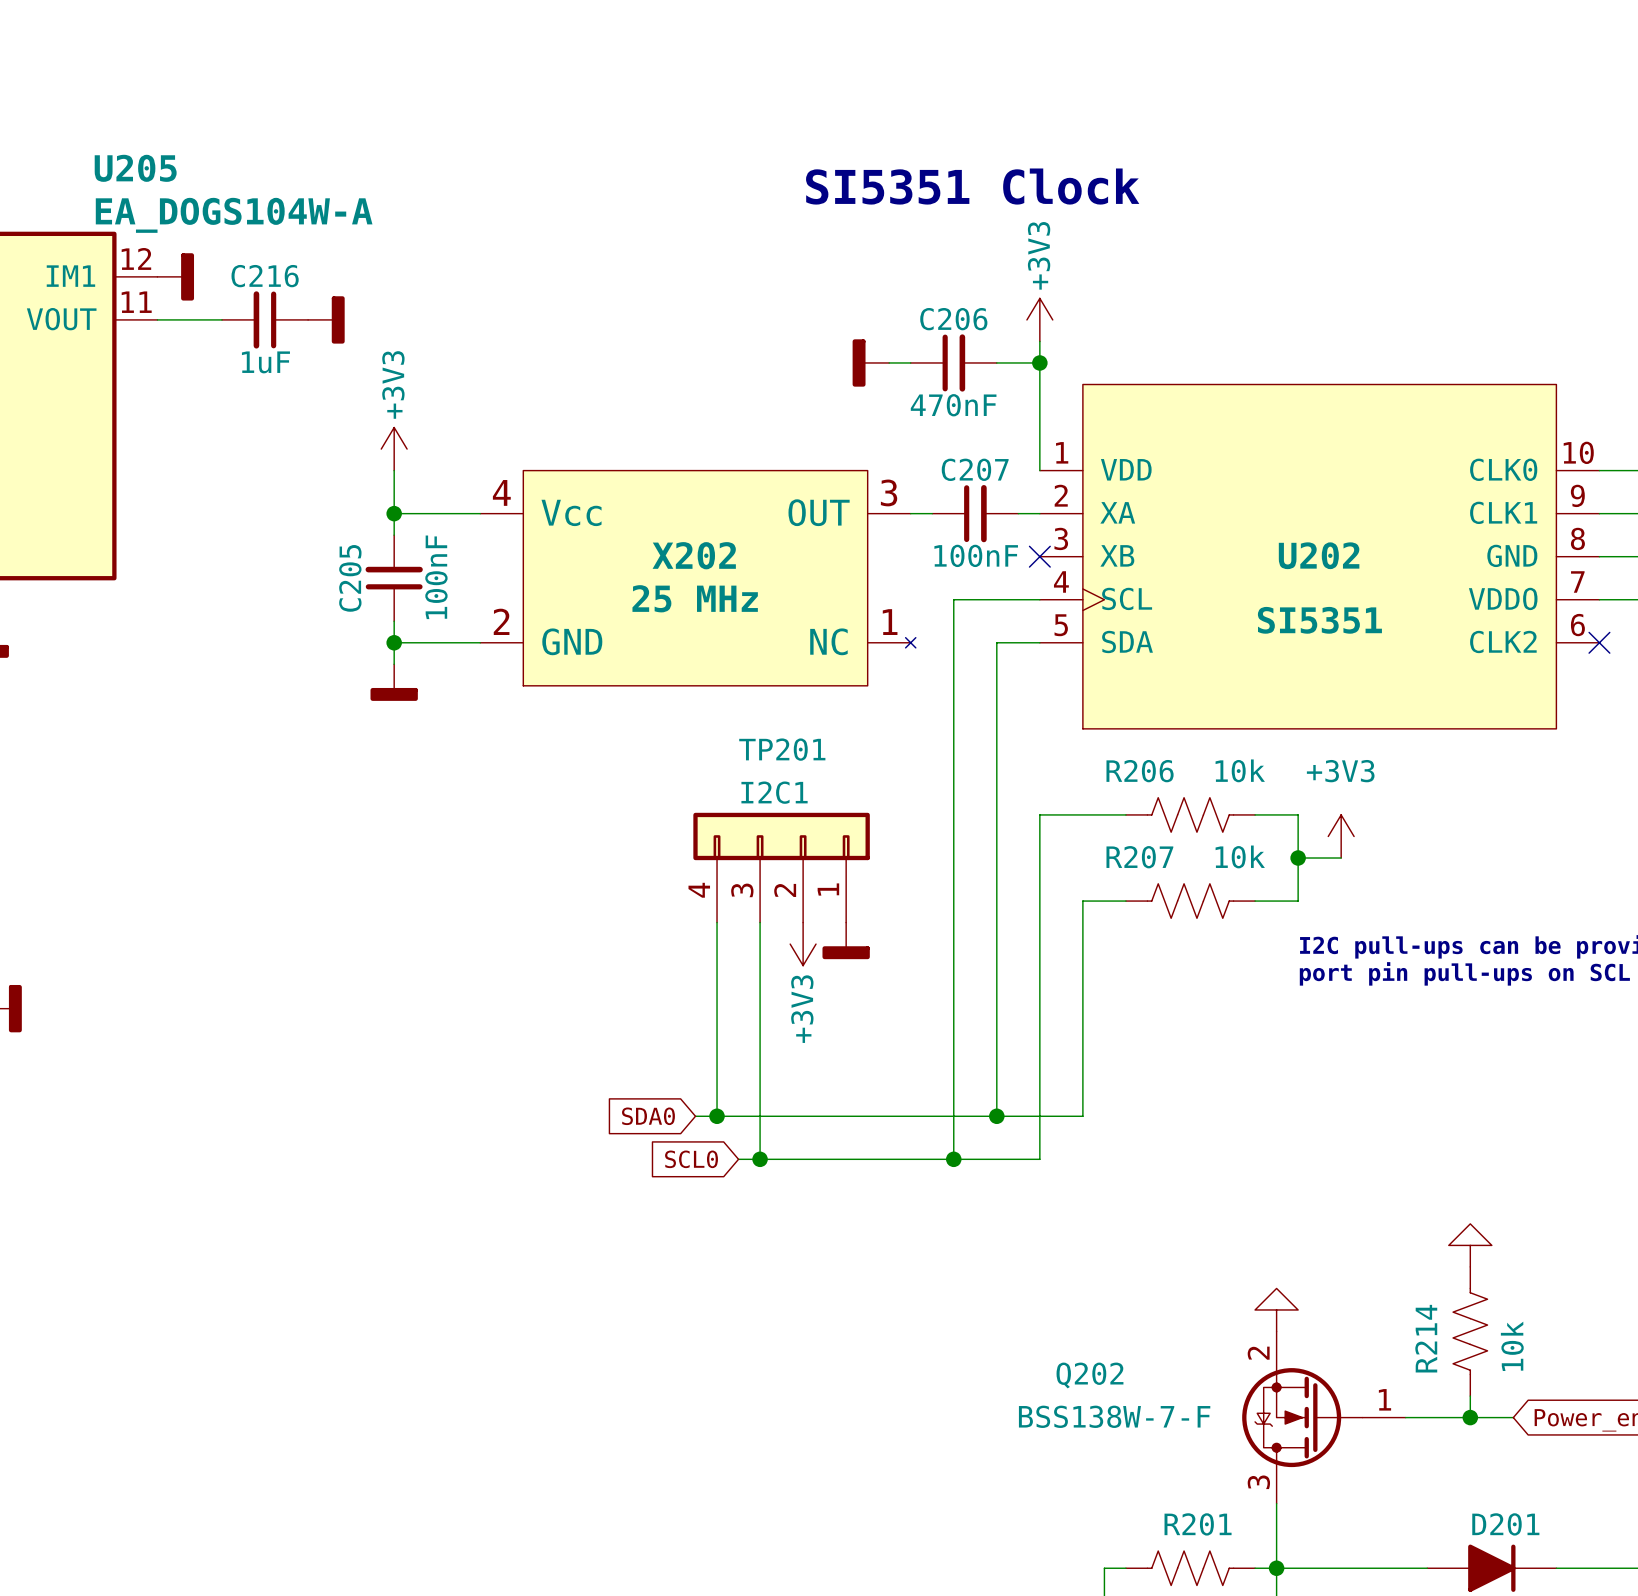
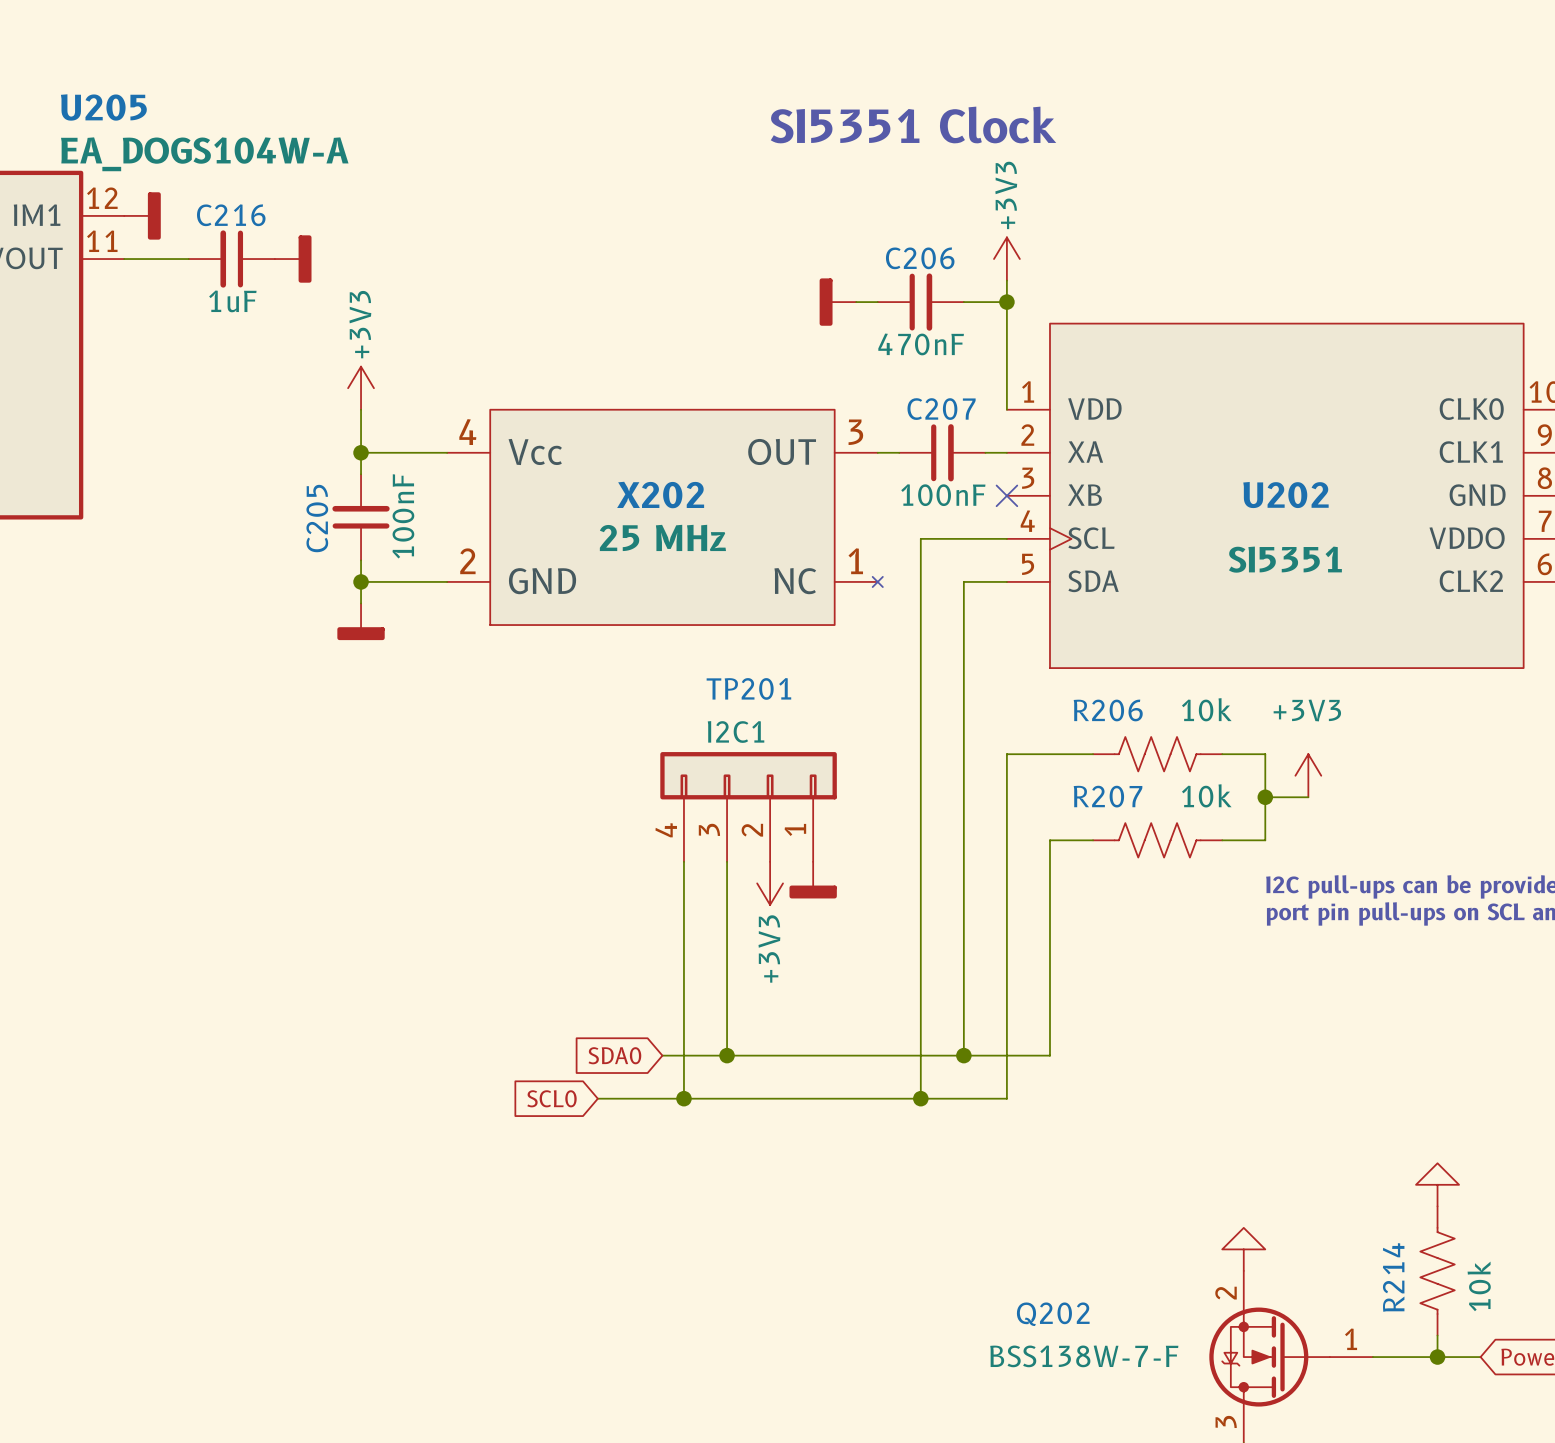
junction: (717, 1116) -> none
wire: (760, 1116) (760, 1159) -> (683, 1055) (683, 1098)
junction: none -> (727, 1055)
wire: none -> (597, 1098) (705, 1098)
global label position: SCL0 (691, 1159) -> SCL0 (551, 1098)
junction: none -> (683, 1098)
junction: (760, 1159) -> none

